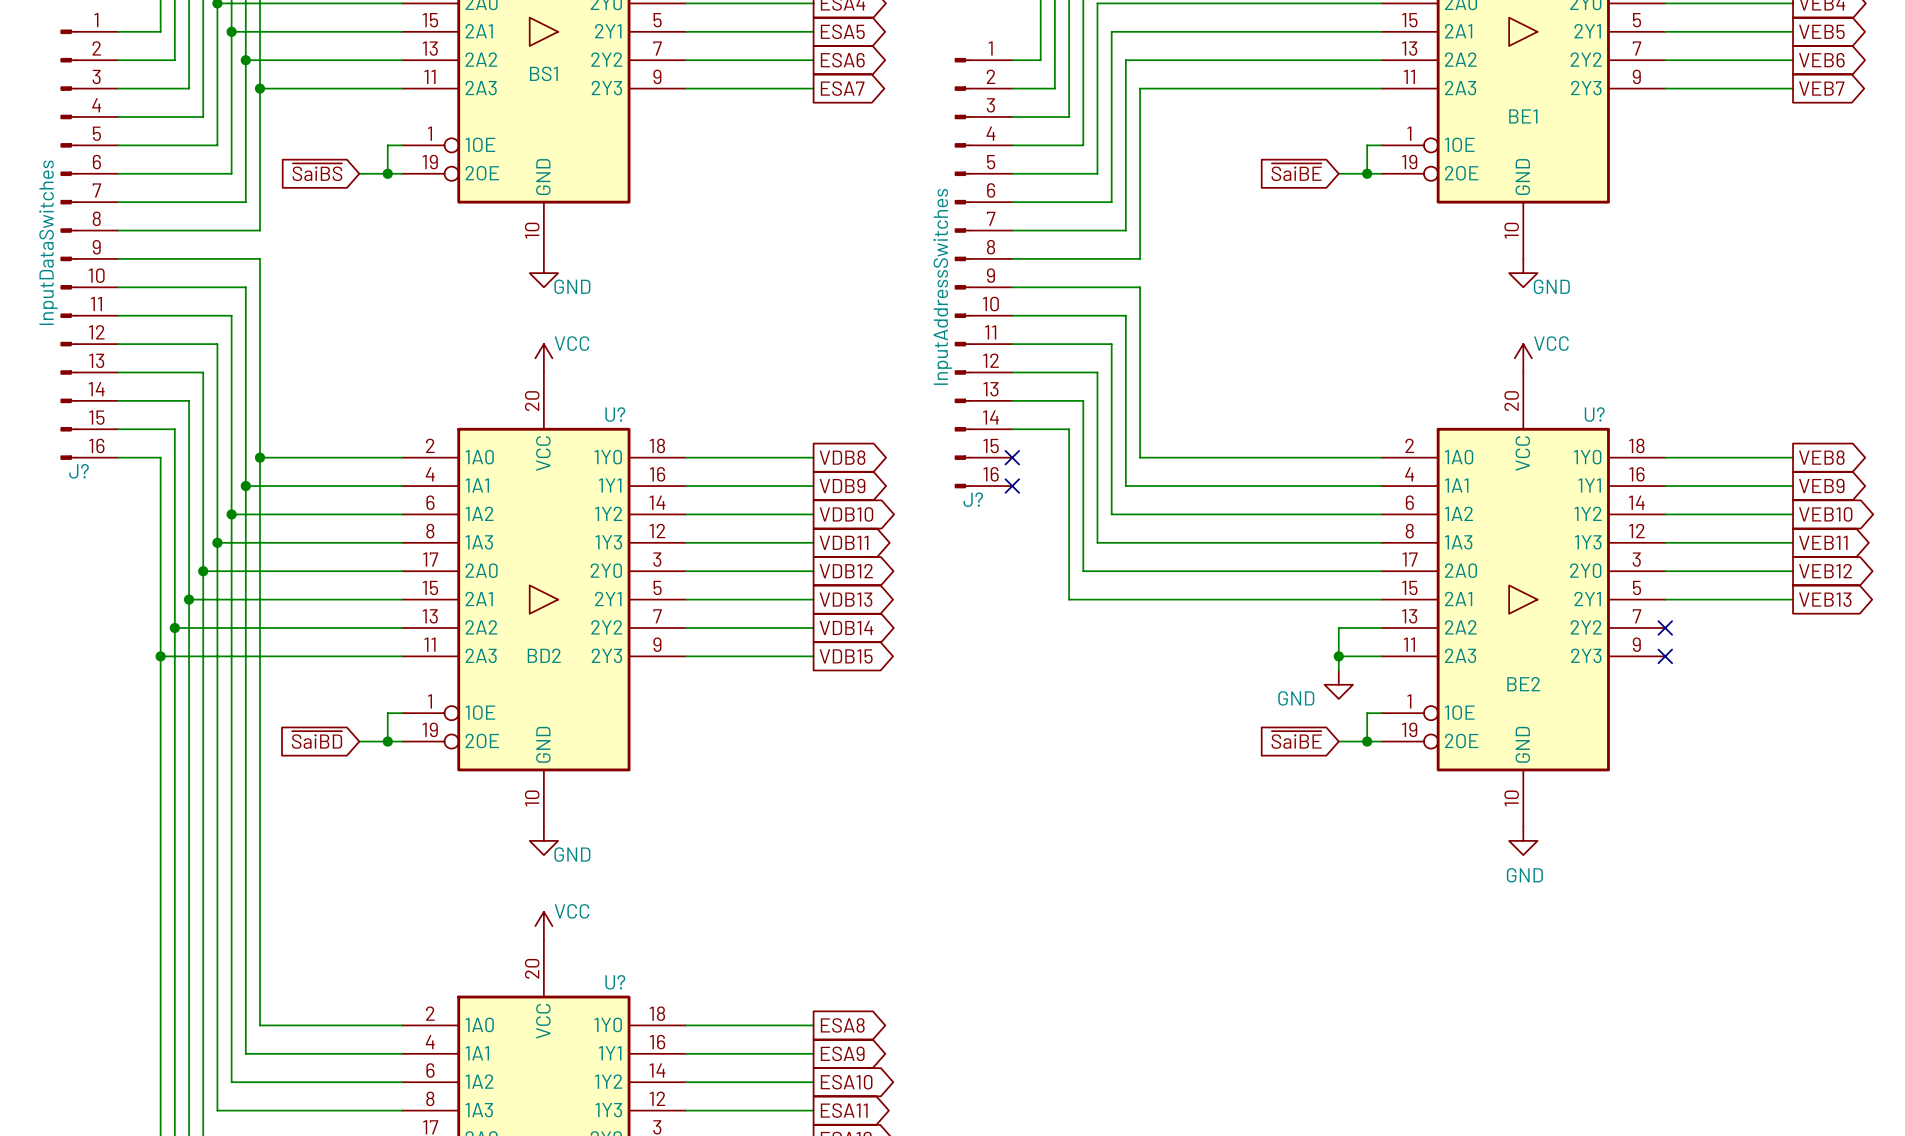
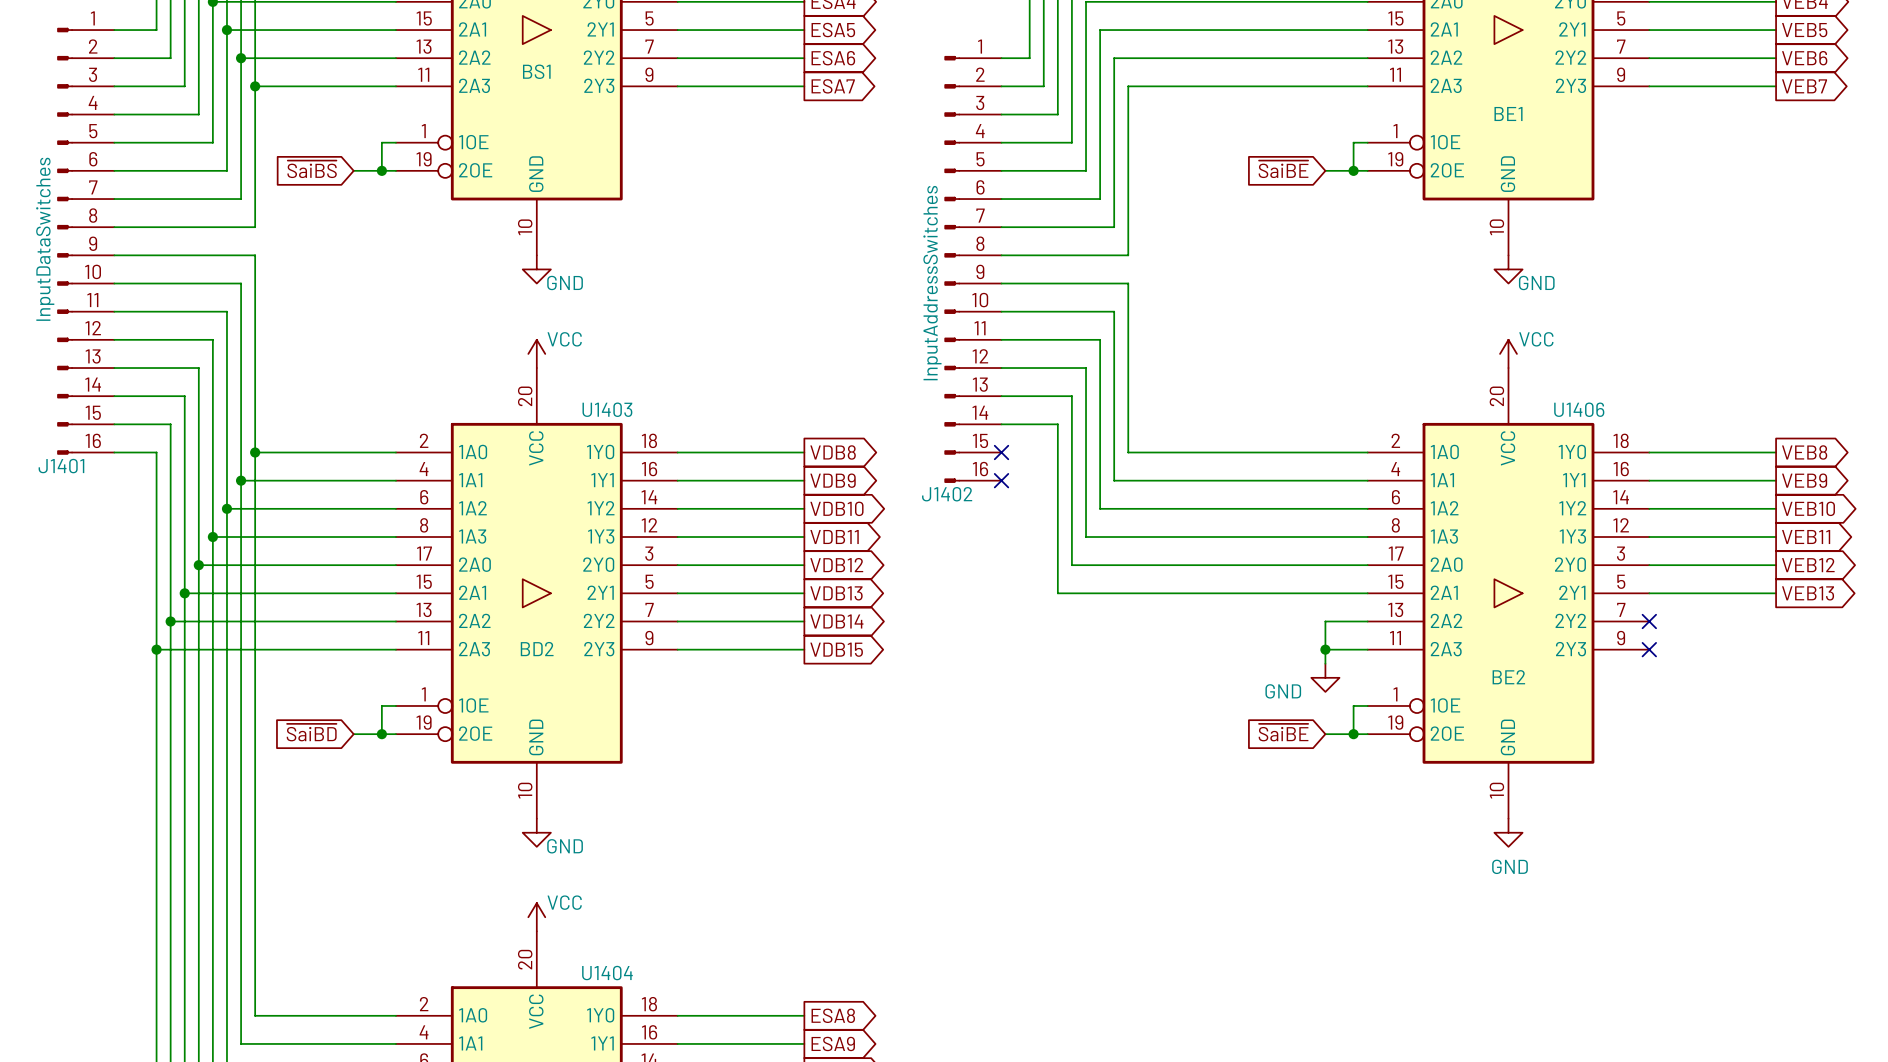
U? name: U? (615, 414) -> U1403 (607, 409)
U? name: U? (1594, 414) -> U1406 (1579, 409)
J? name: J? (79, 471) -> J1401 (61, 466)
J? name: J? (973, 499) -> J1402 (947, 494)
U? name: U? (615, 982) -> U1404 (607, 973)

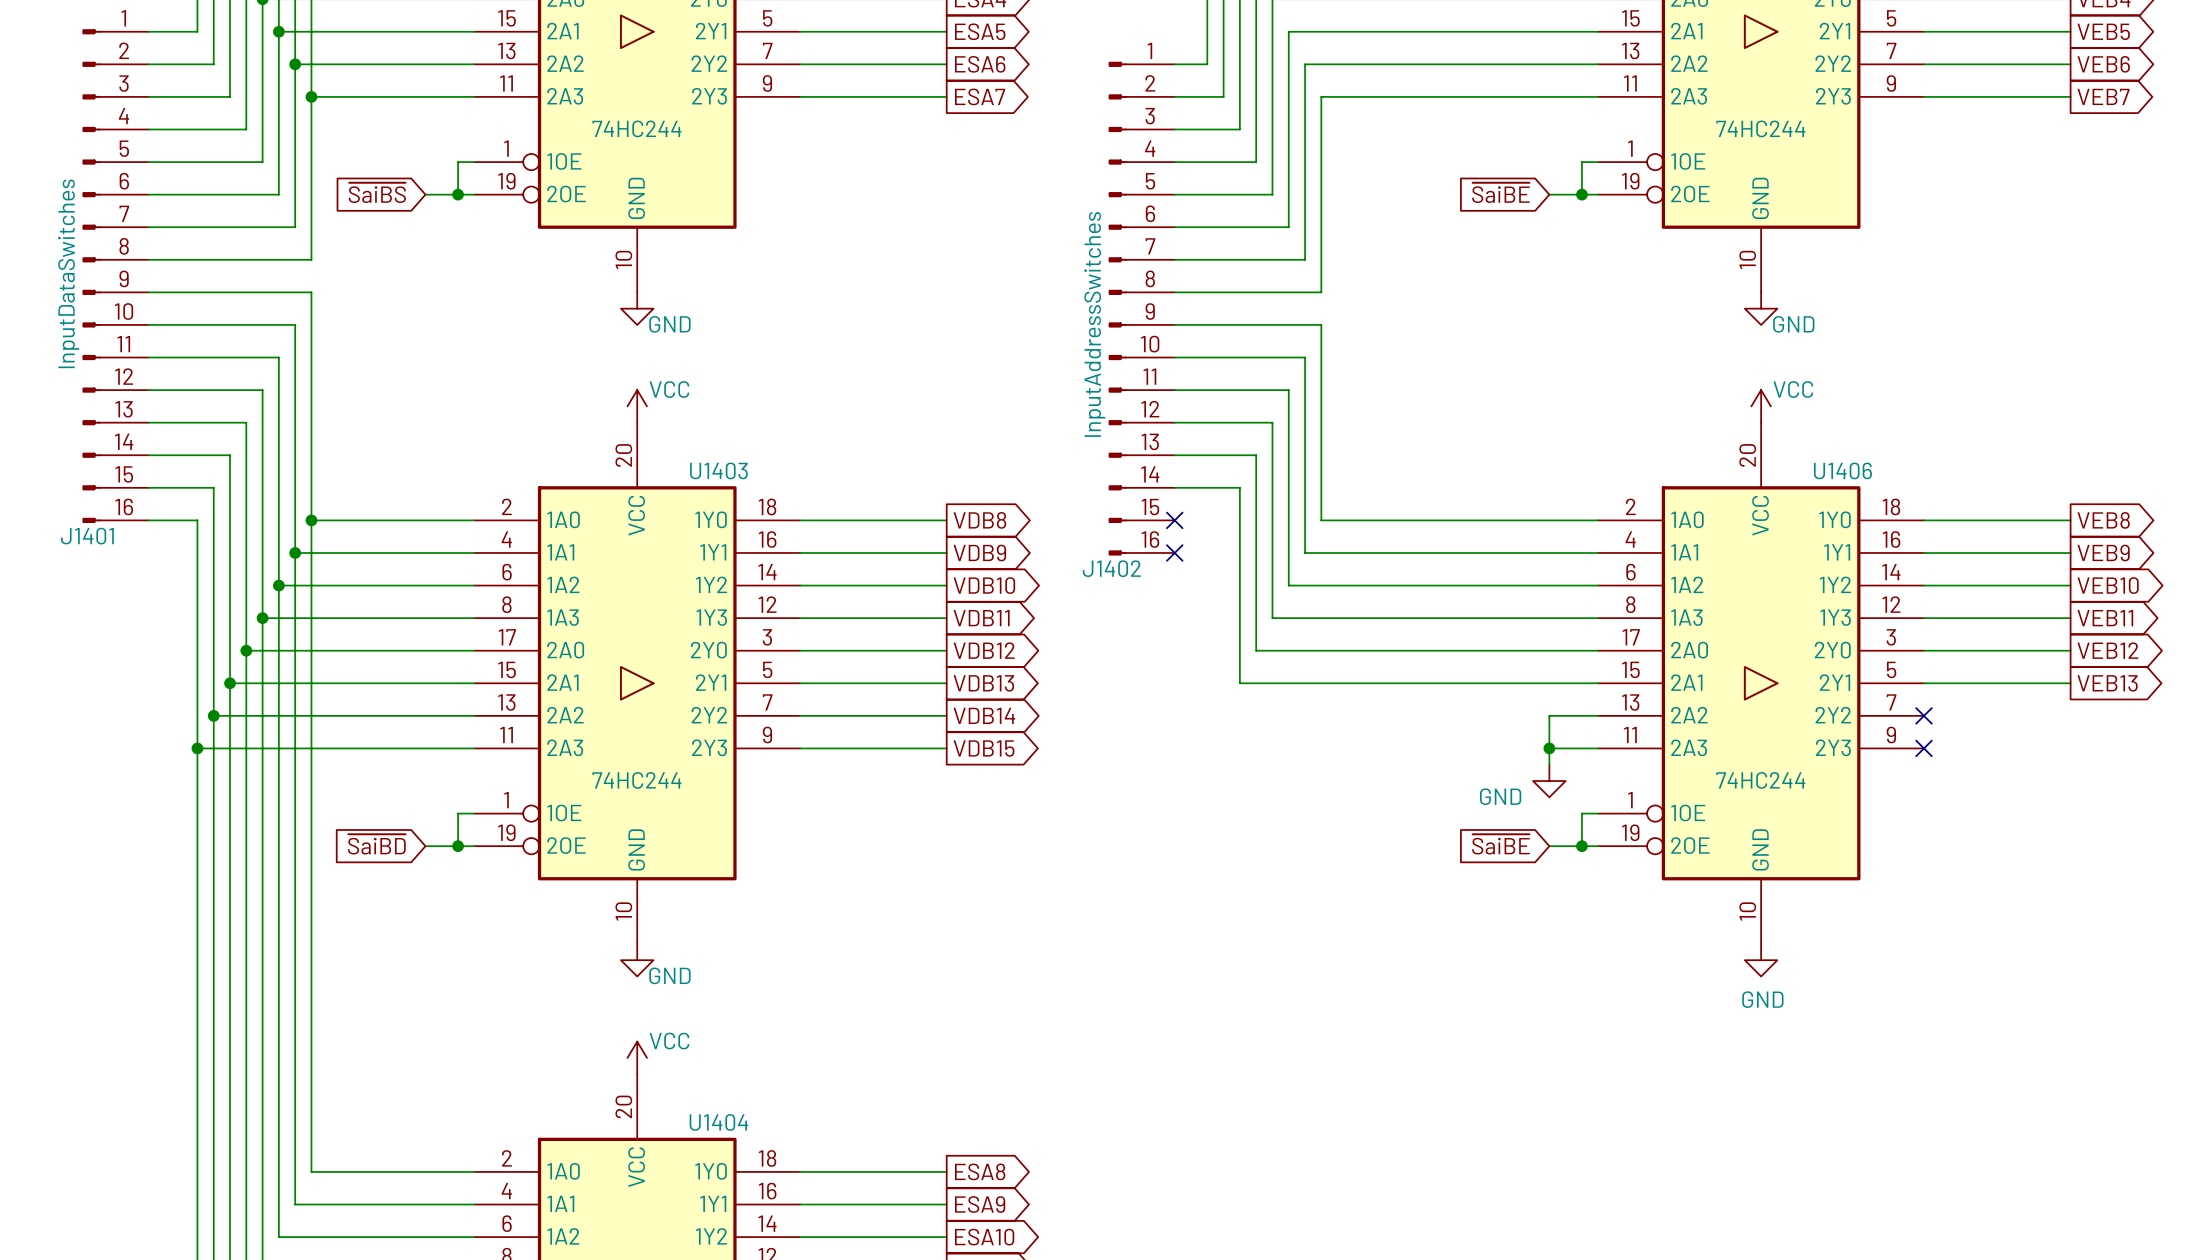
part value: BS1 (536, 71) -> 74HC244 (636, 128)
part value: BE1 (1508, 114) -> 74HC244 (1760, 128)
U1403 value: BD2 (537, 649) -> 74HC244 (636, 780)
U1406 value: BE2 (1508, 677) -> 74HC244 (1760, 780)

